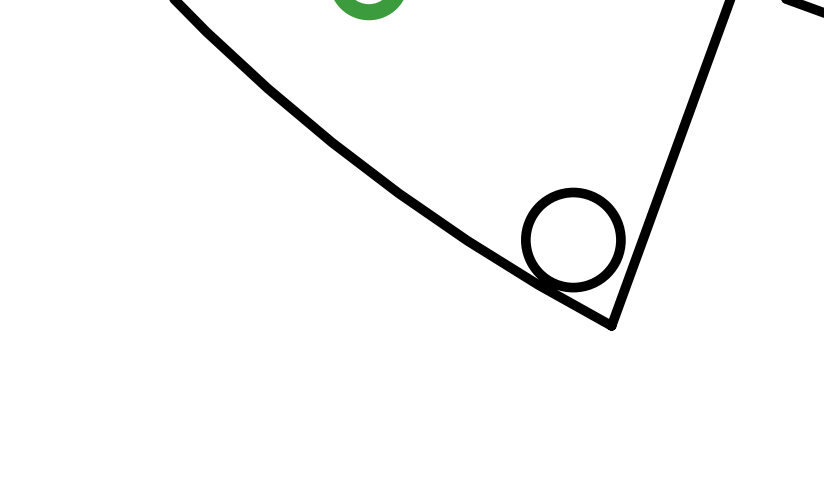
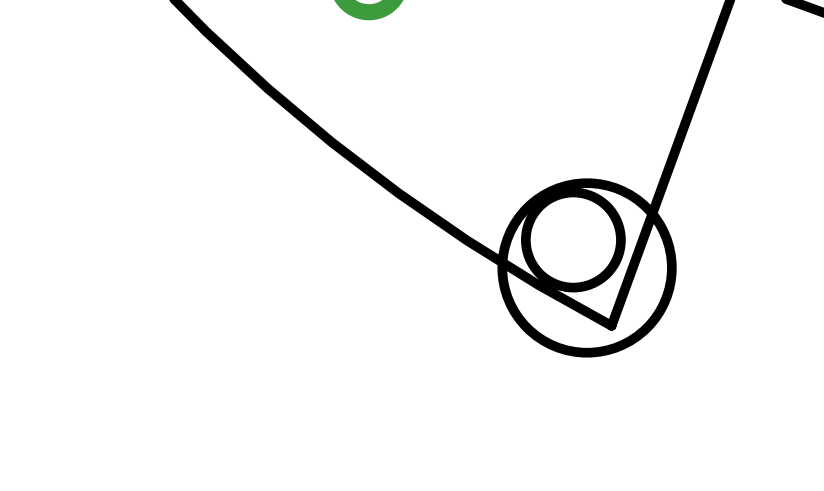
round board edge: none -> [497, 178, 677, 358]

